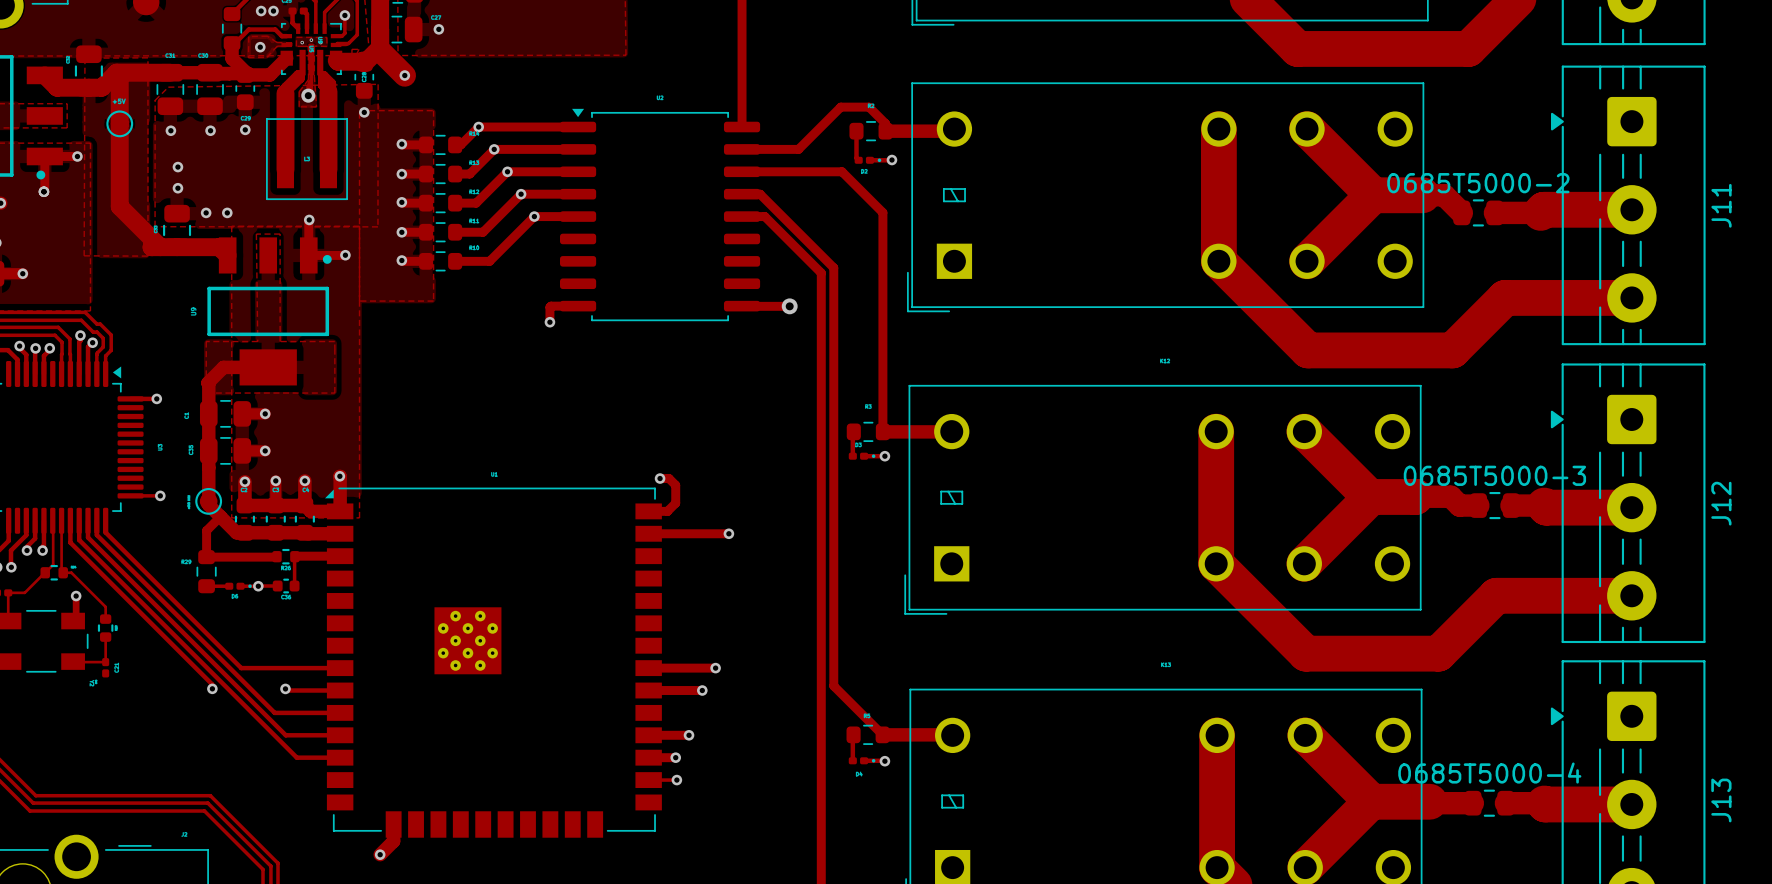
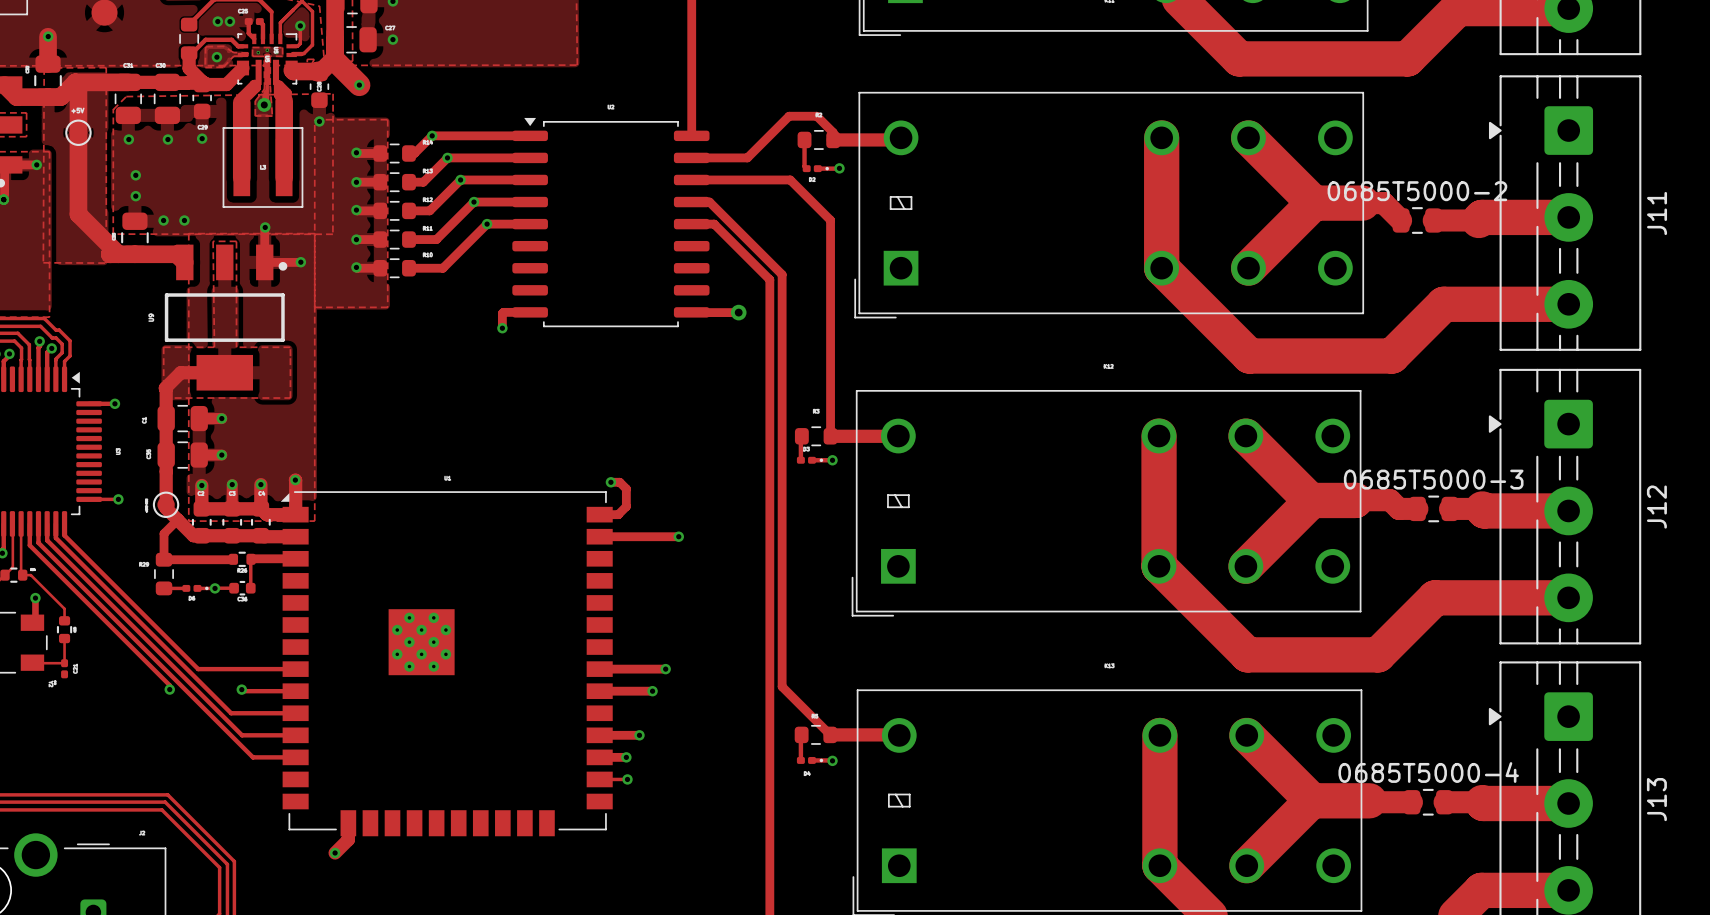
track: none -> (48, 36) (48, 64)
via: none -> (48, 36)

